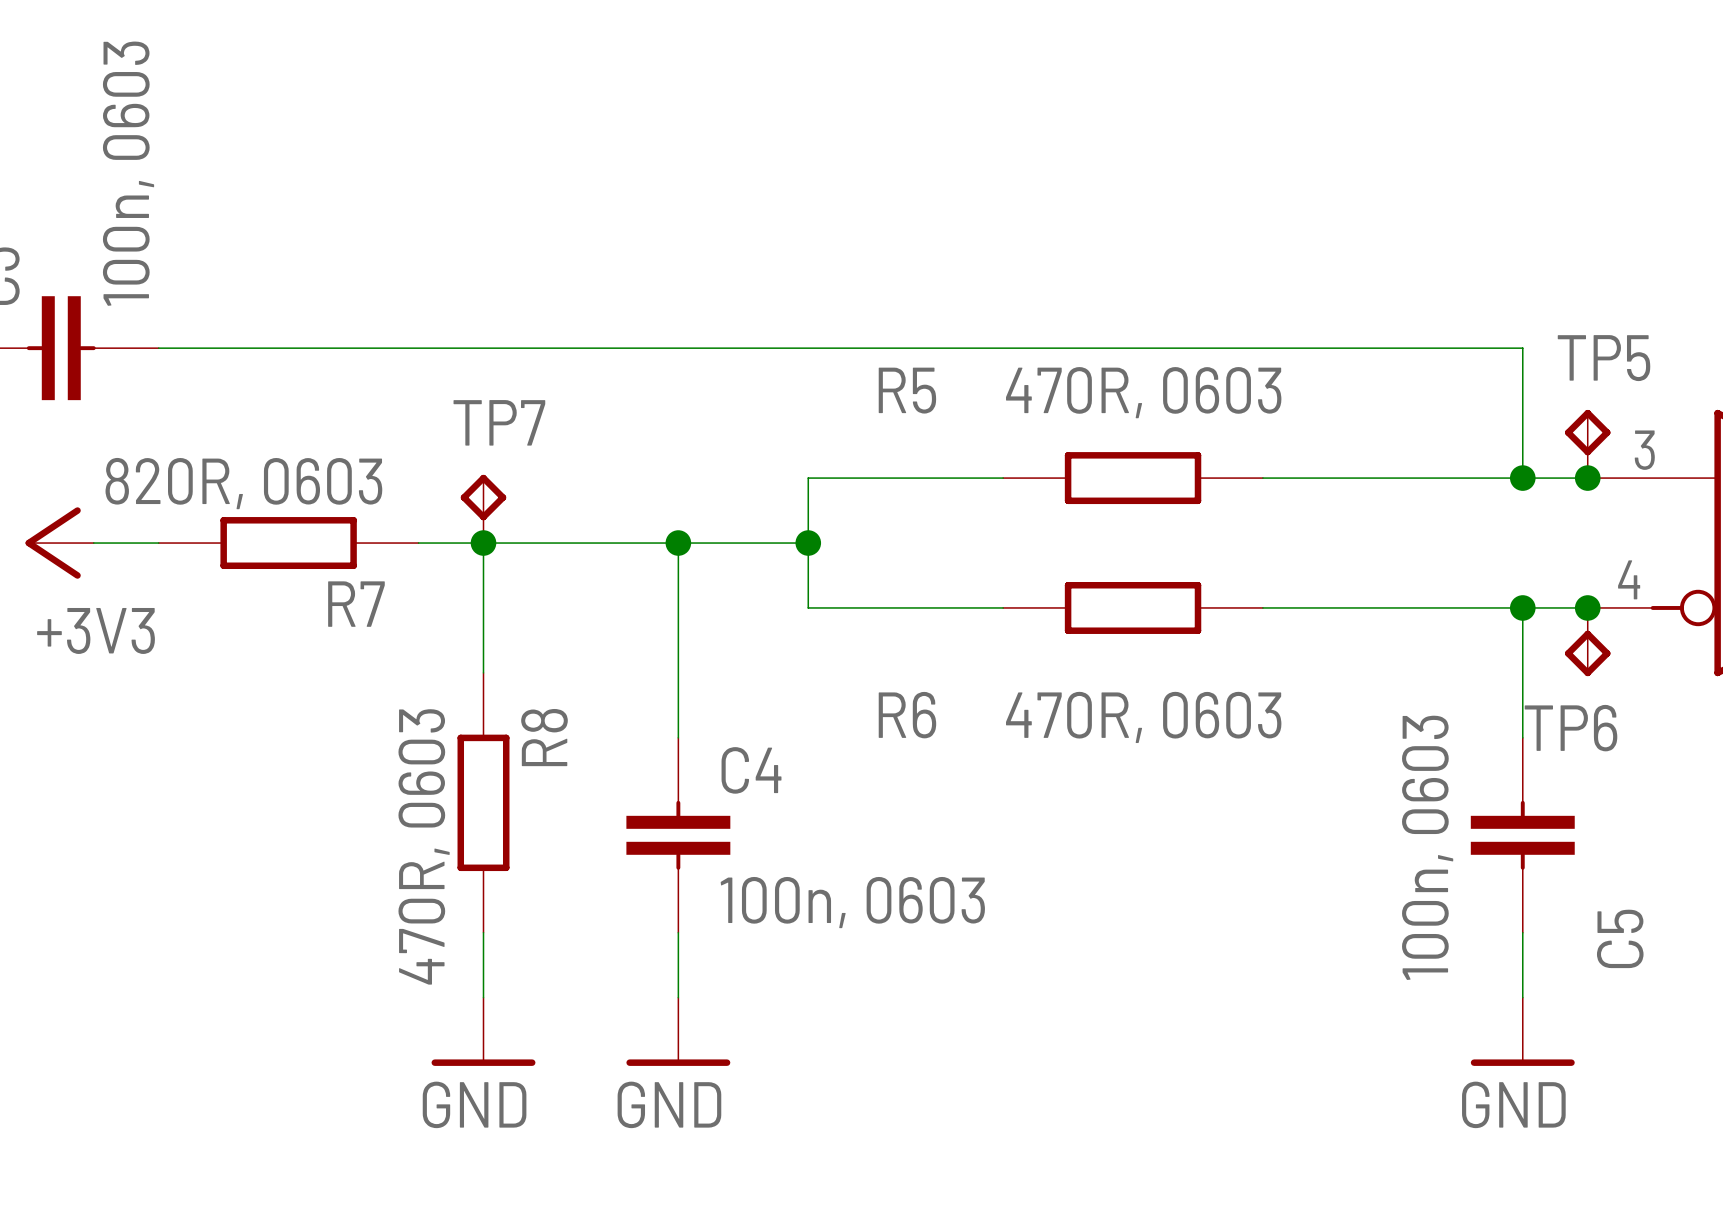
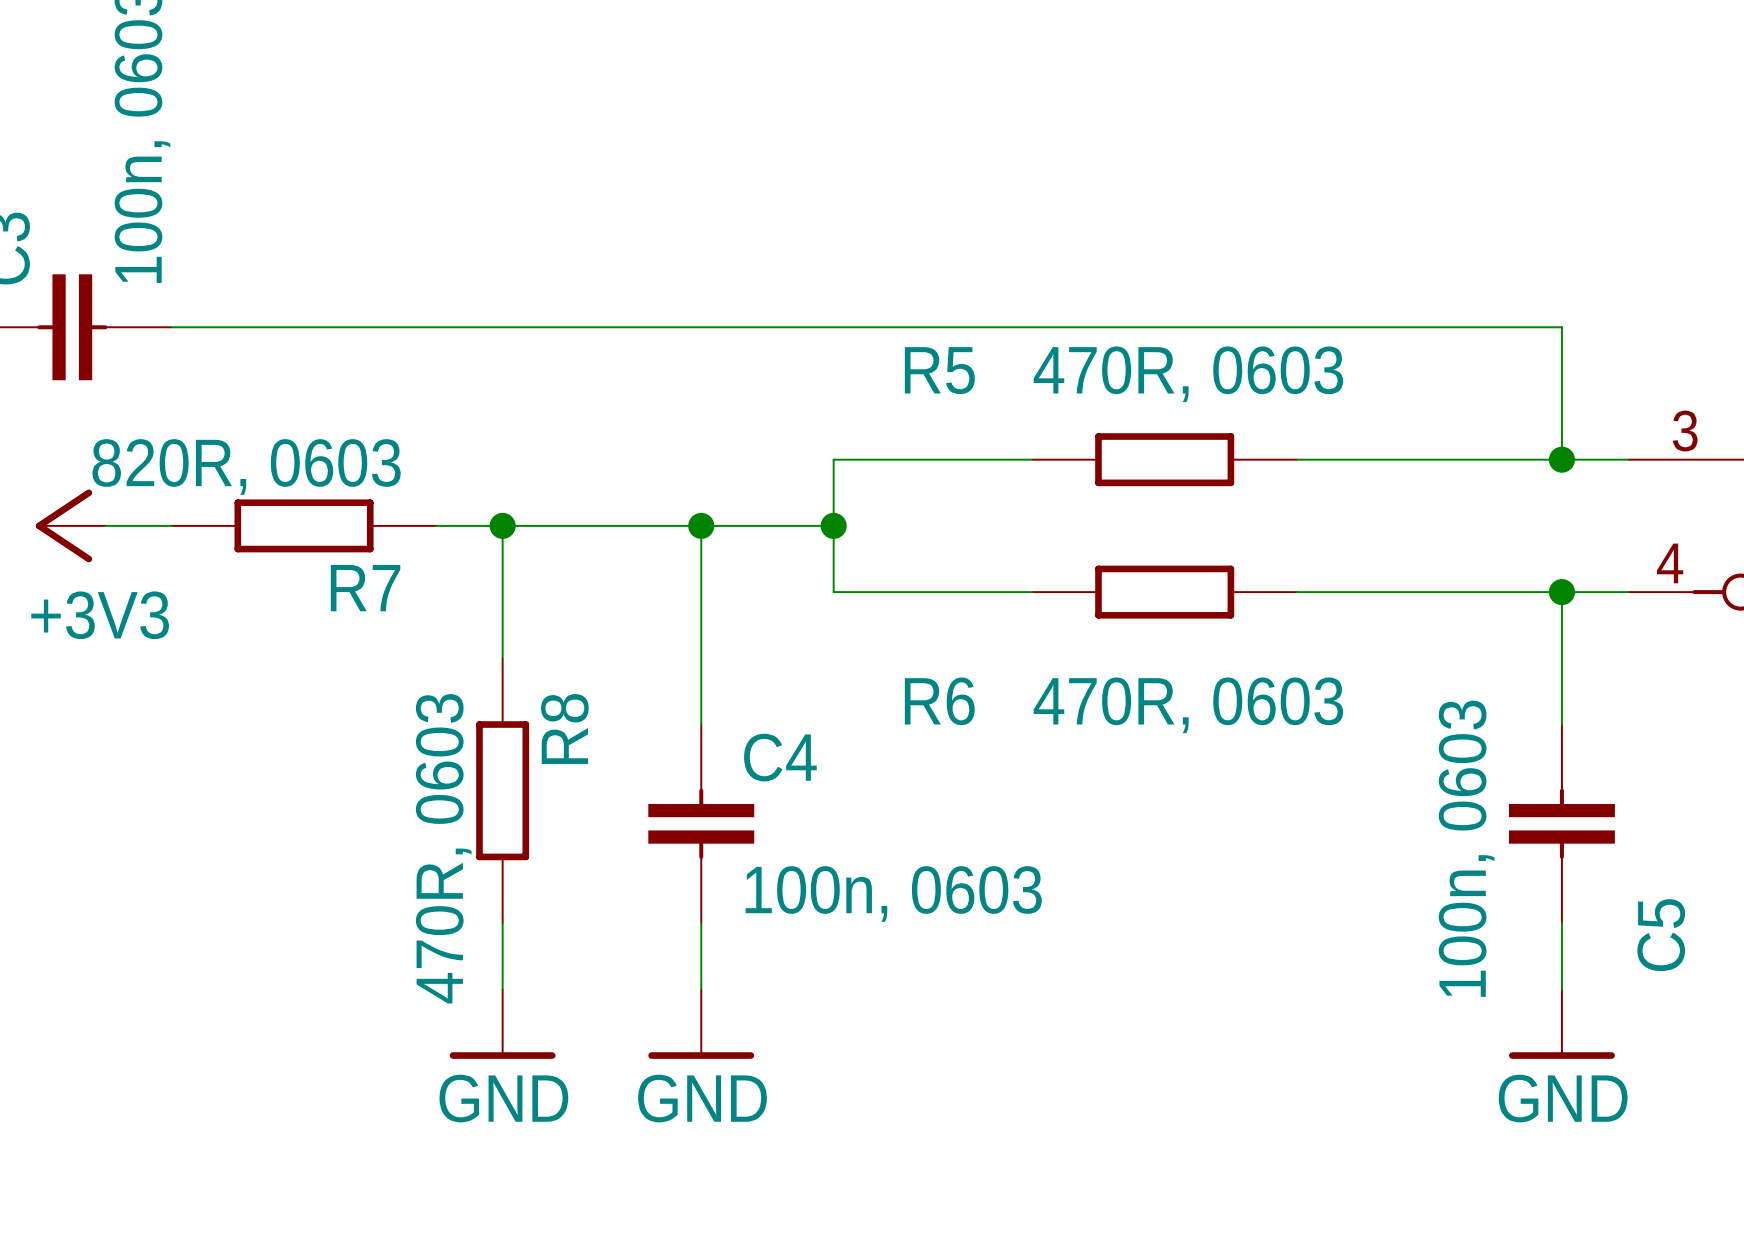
TP5: (1587, 443) -> none
junction: (1587, 478) -> none
TP7: (483, 508) -> none
junction: (1587, 607) -> none
TP6: (1587, 642) -> none

